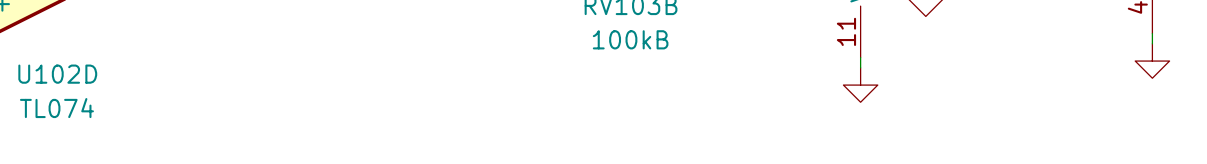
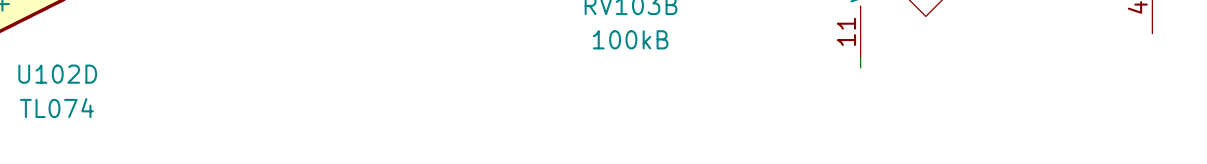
wire: (1152, 33) (1152, 43) -> none
power symbol: (1152, 61) -> none
power symbol: (860, 85) -> none

